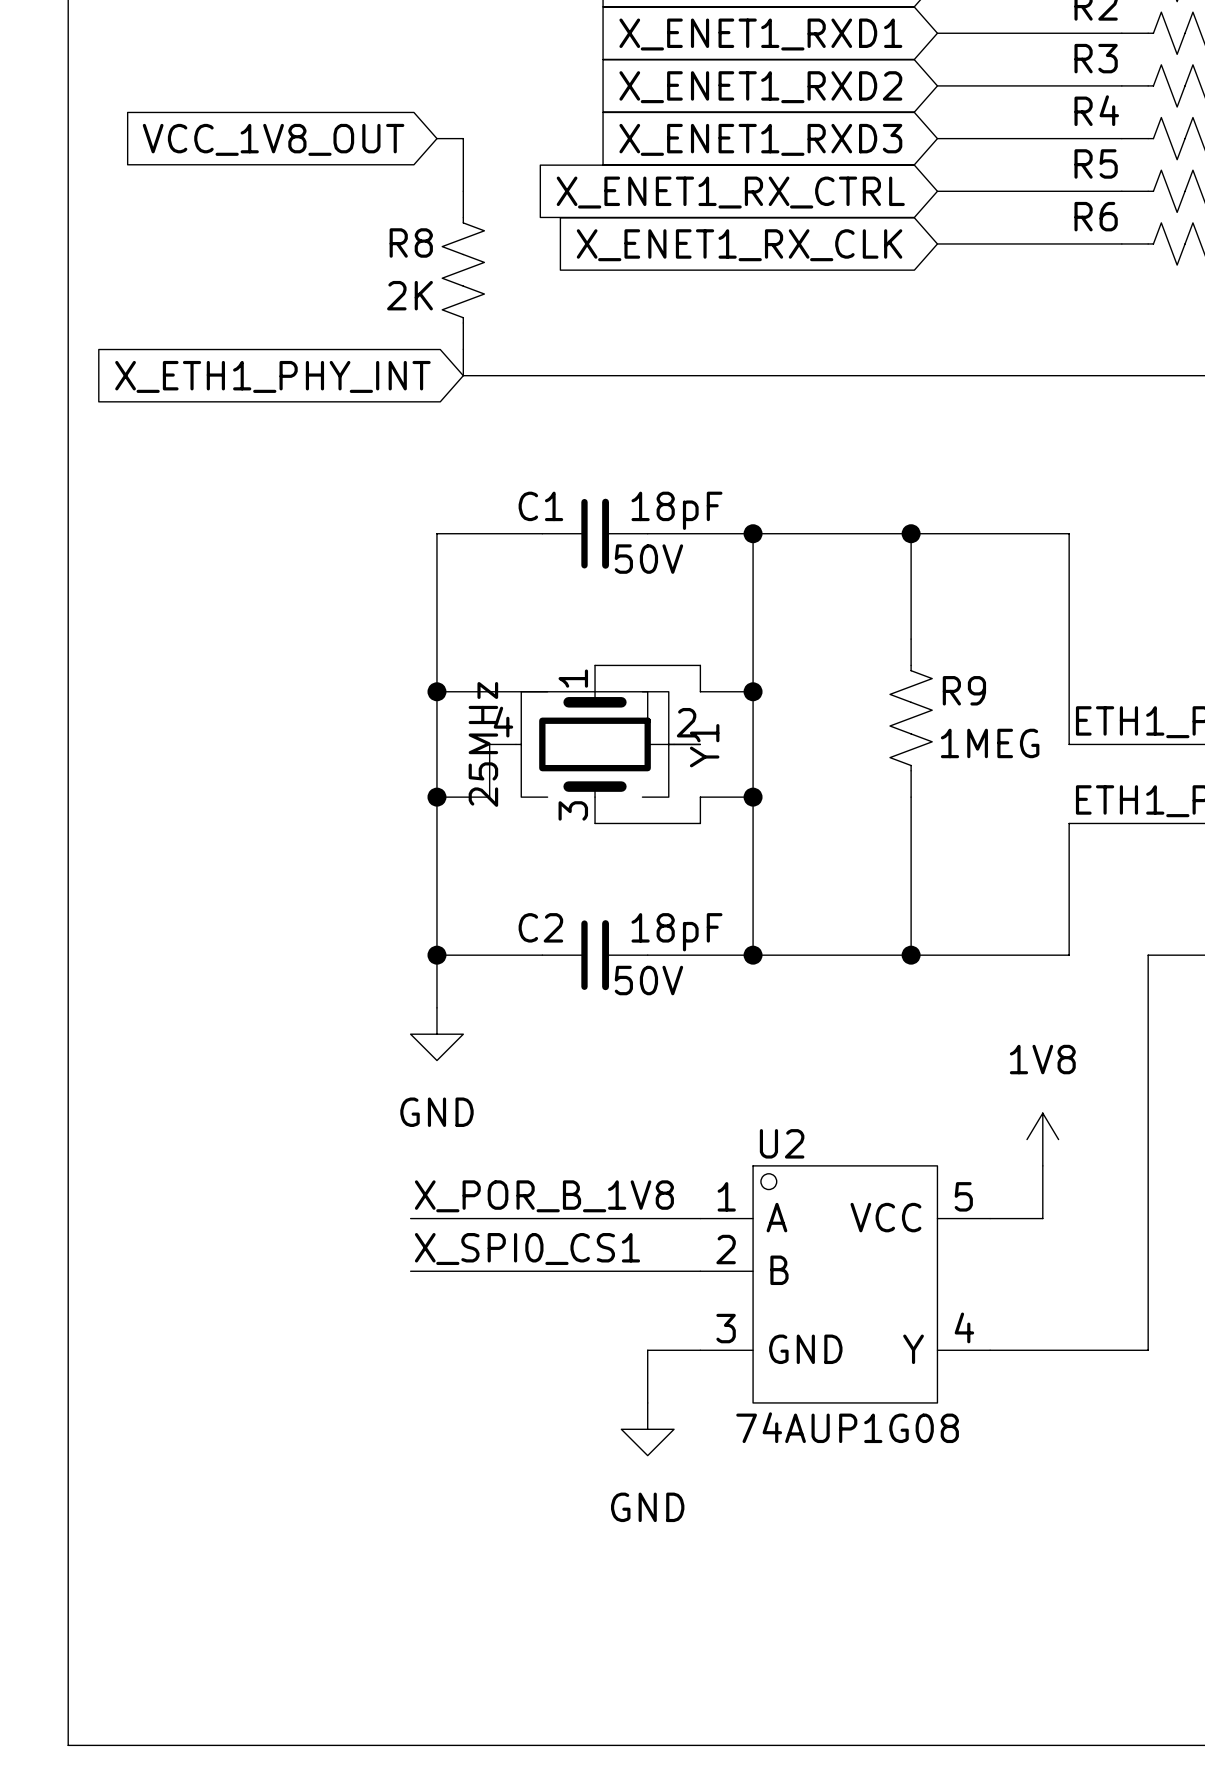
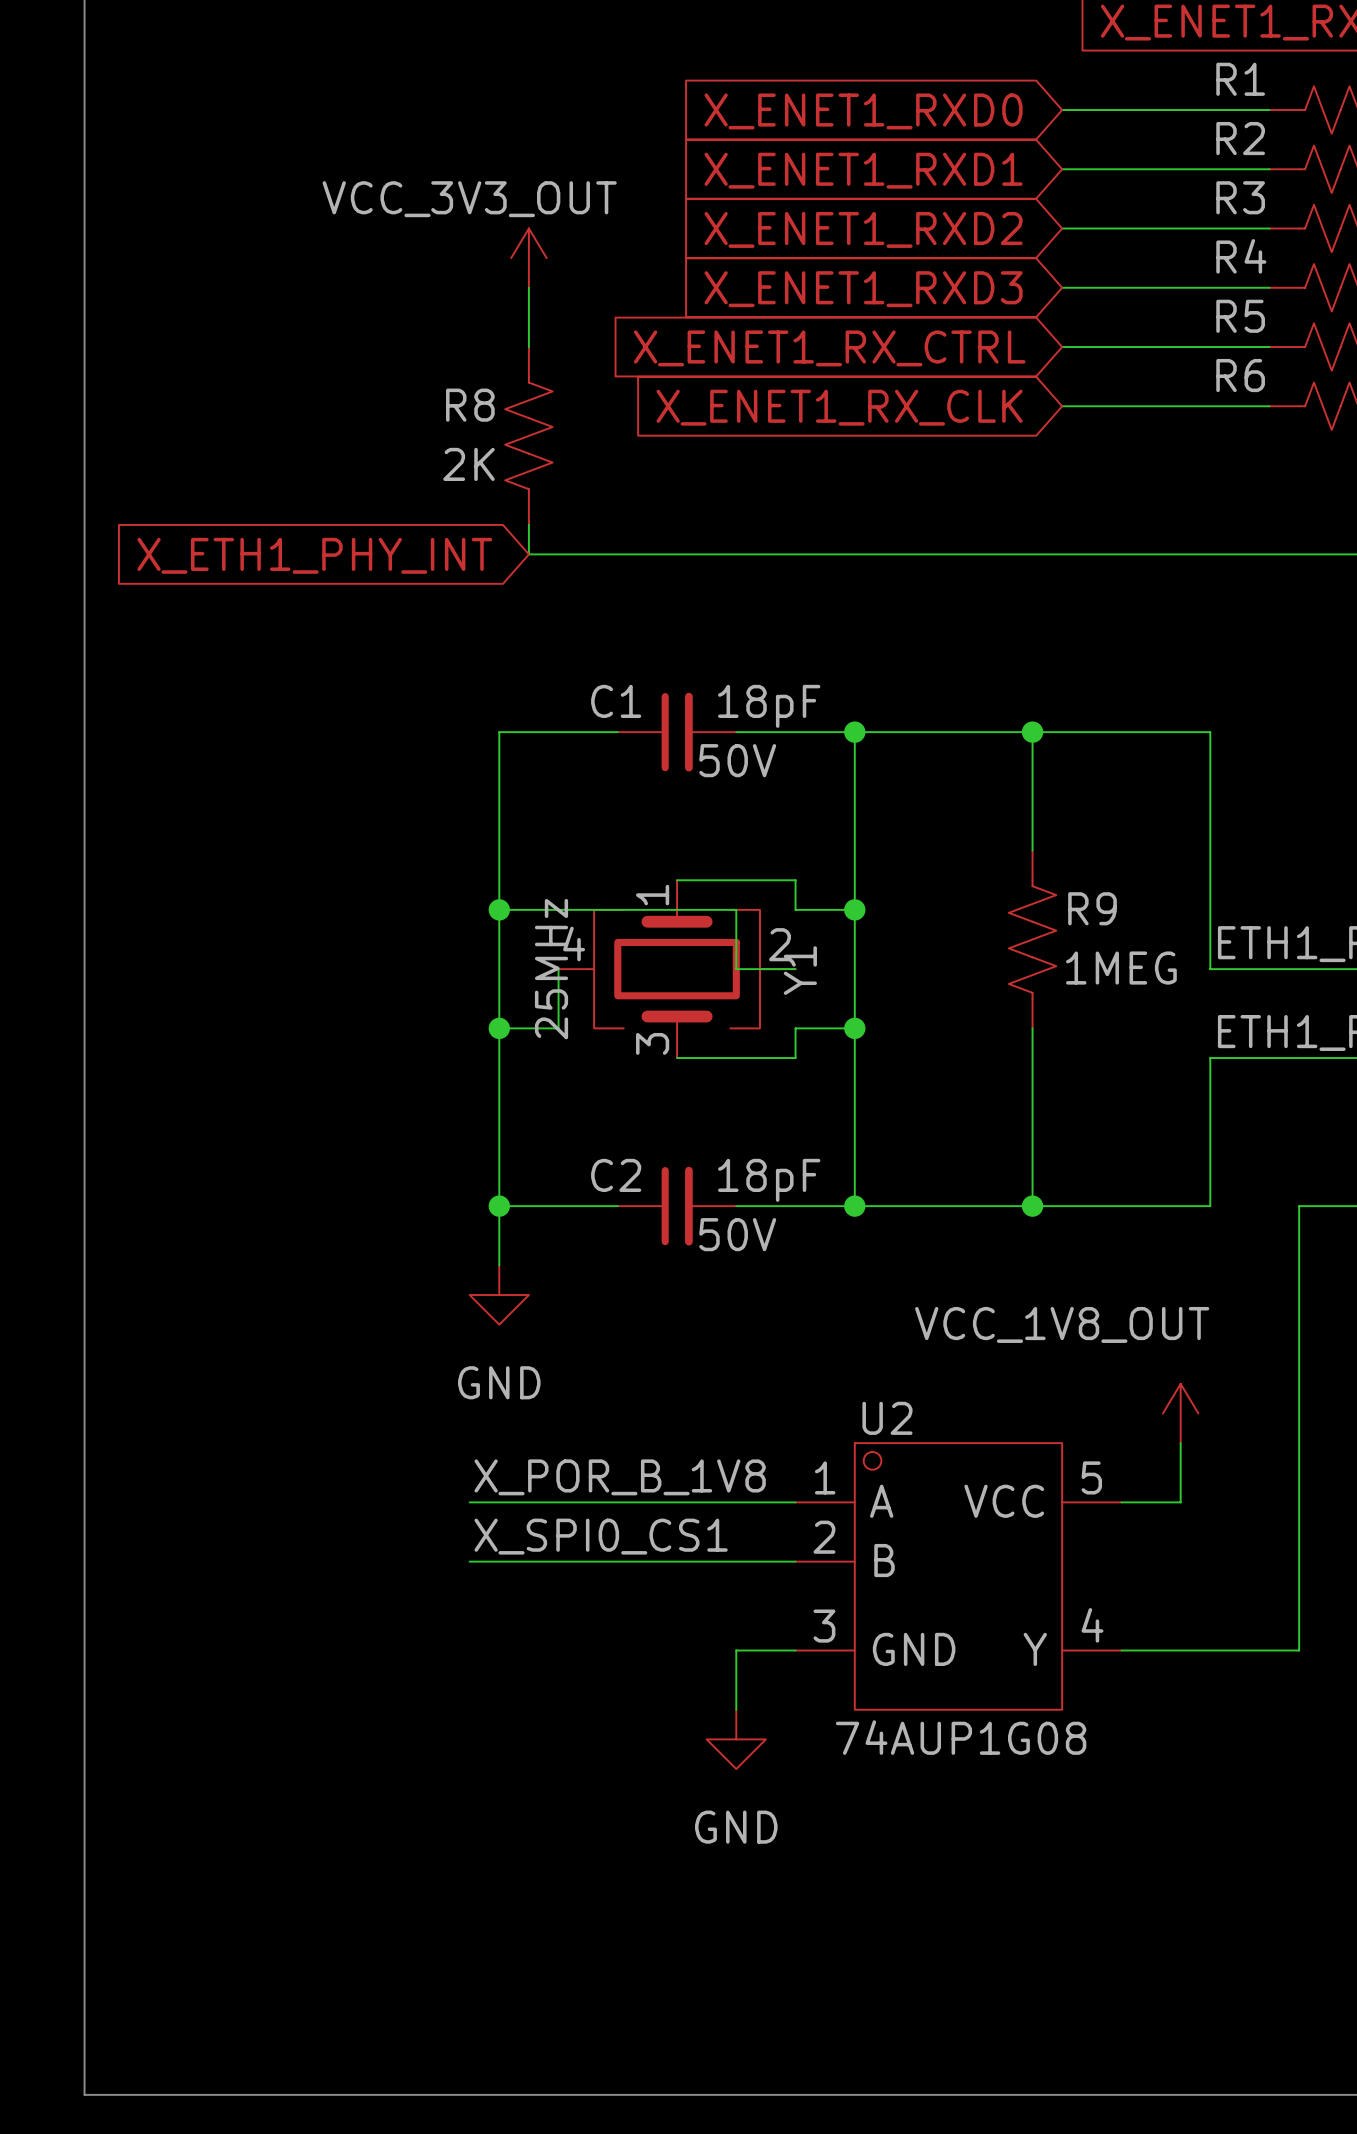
power symbol: none -> VCC_3V3_OUT (528, 258)
wire: (436, 138) (463, 138) -> none
global label: VCC_1V8_OUT (273, 139) -> none
power symbol: 1V8 (1042, 1139) -> VCC_1V8_OUT (1180, 1413)

